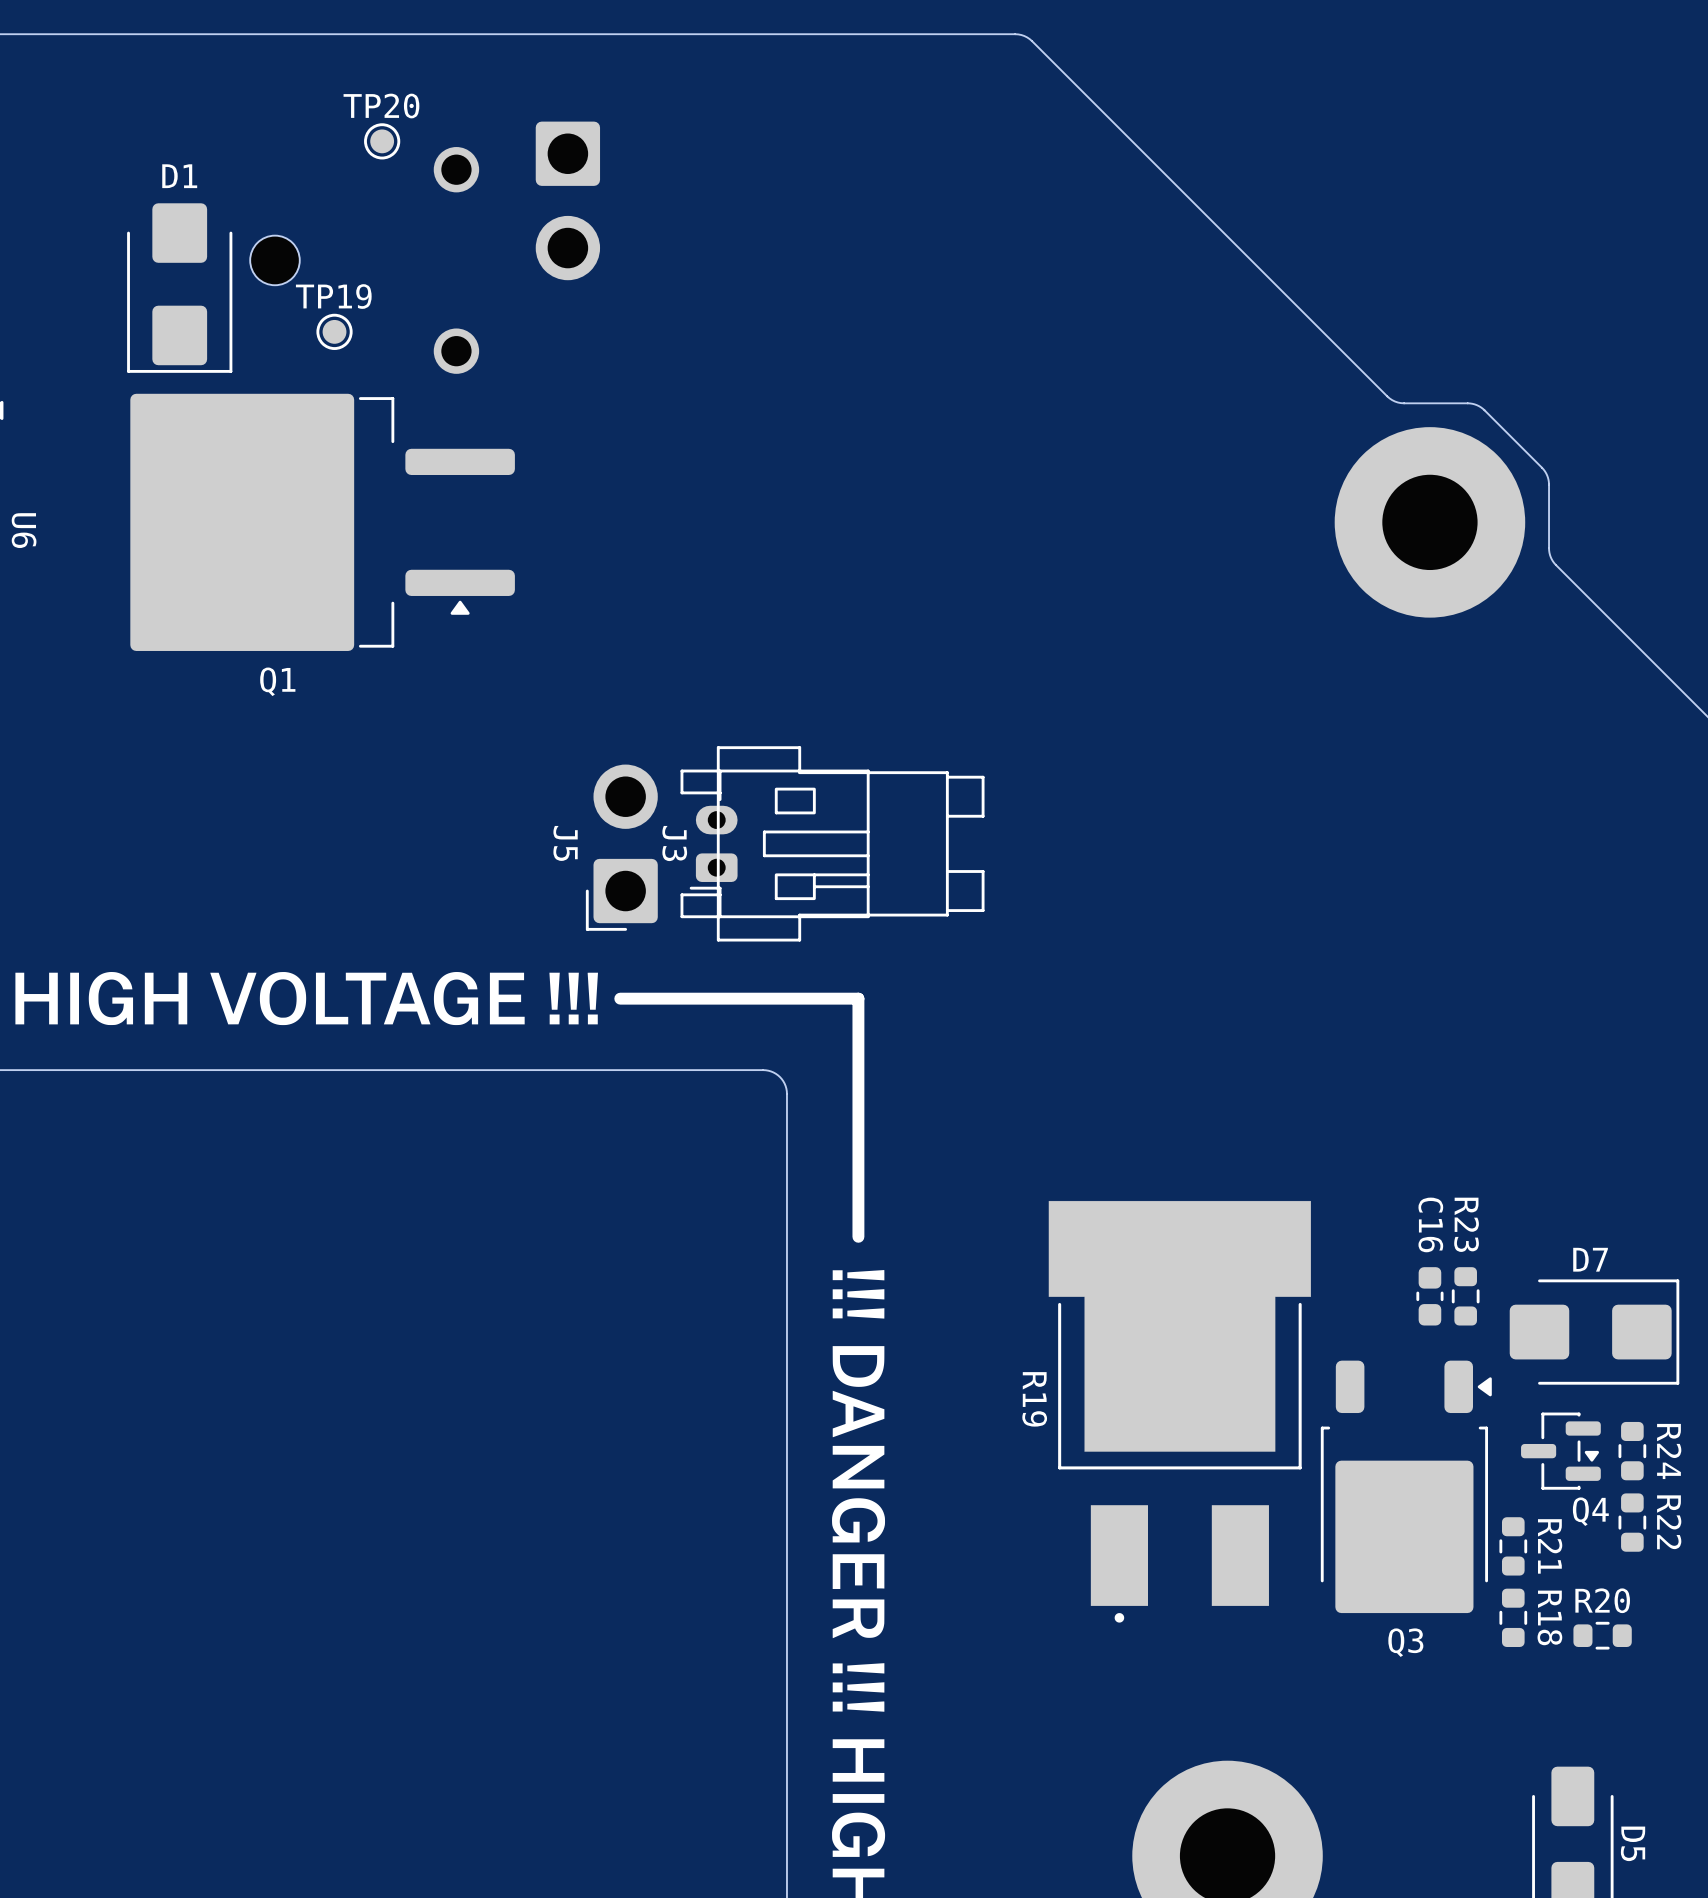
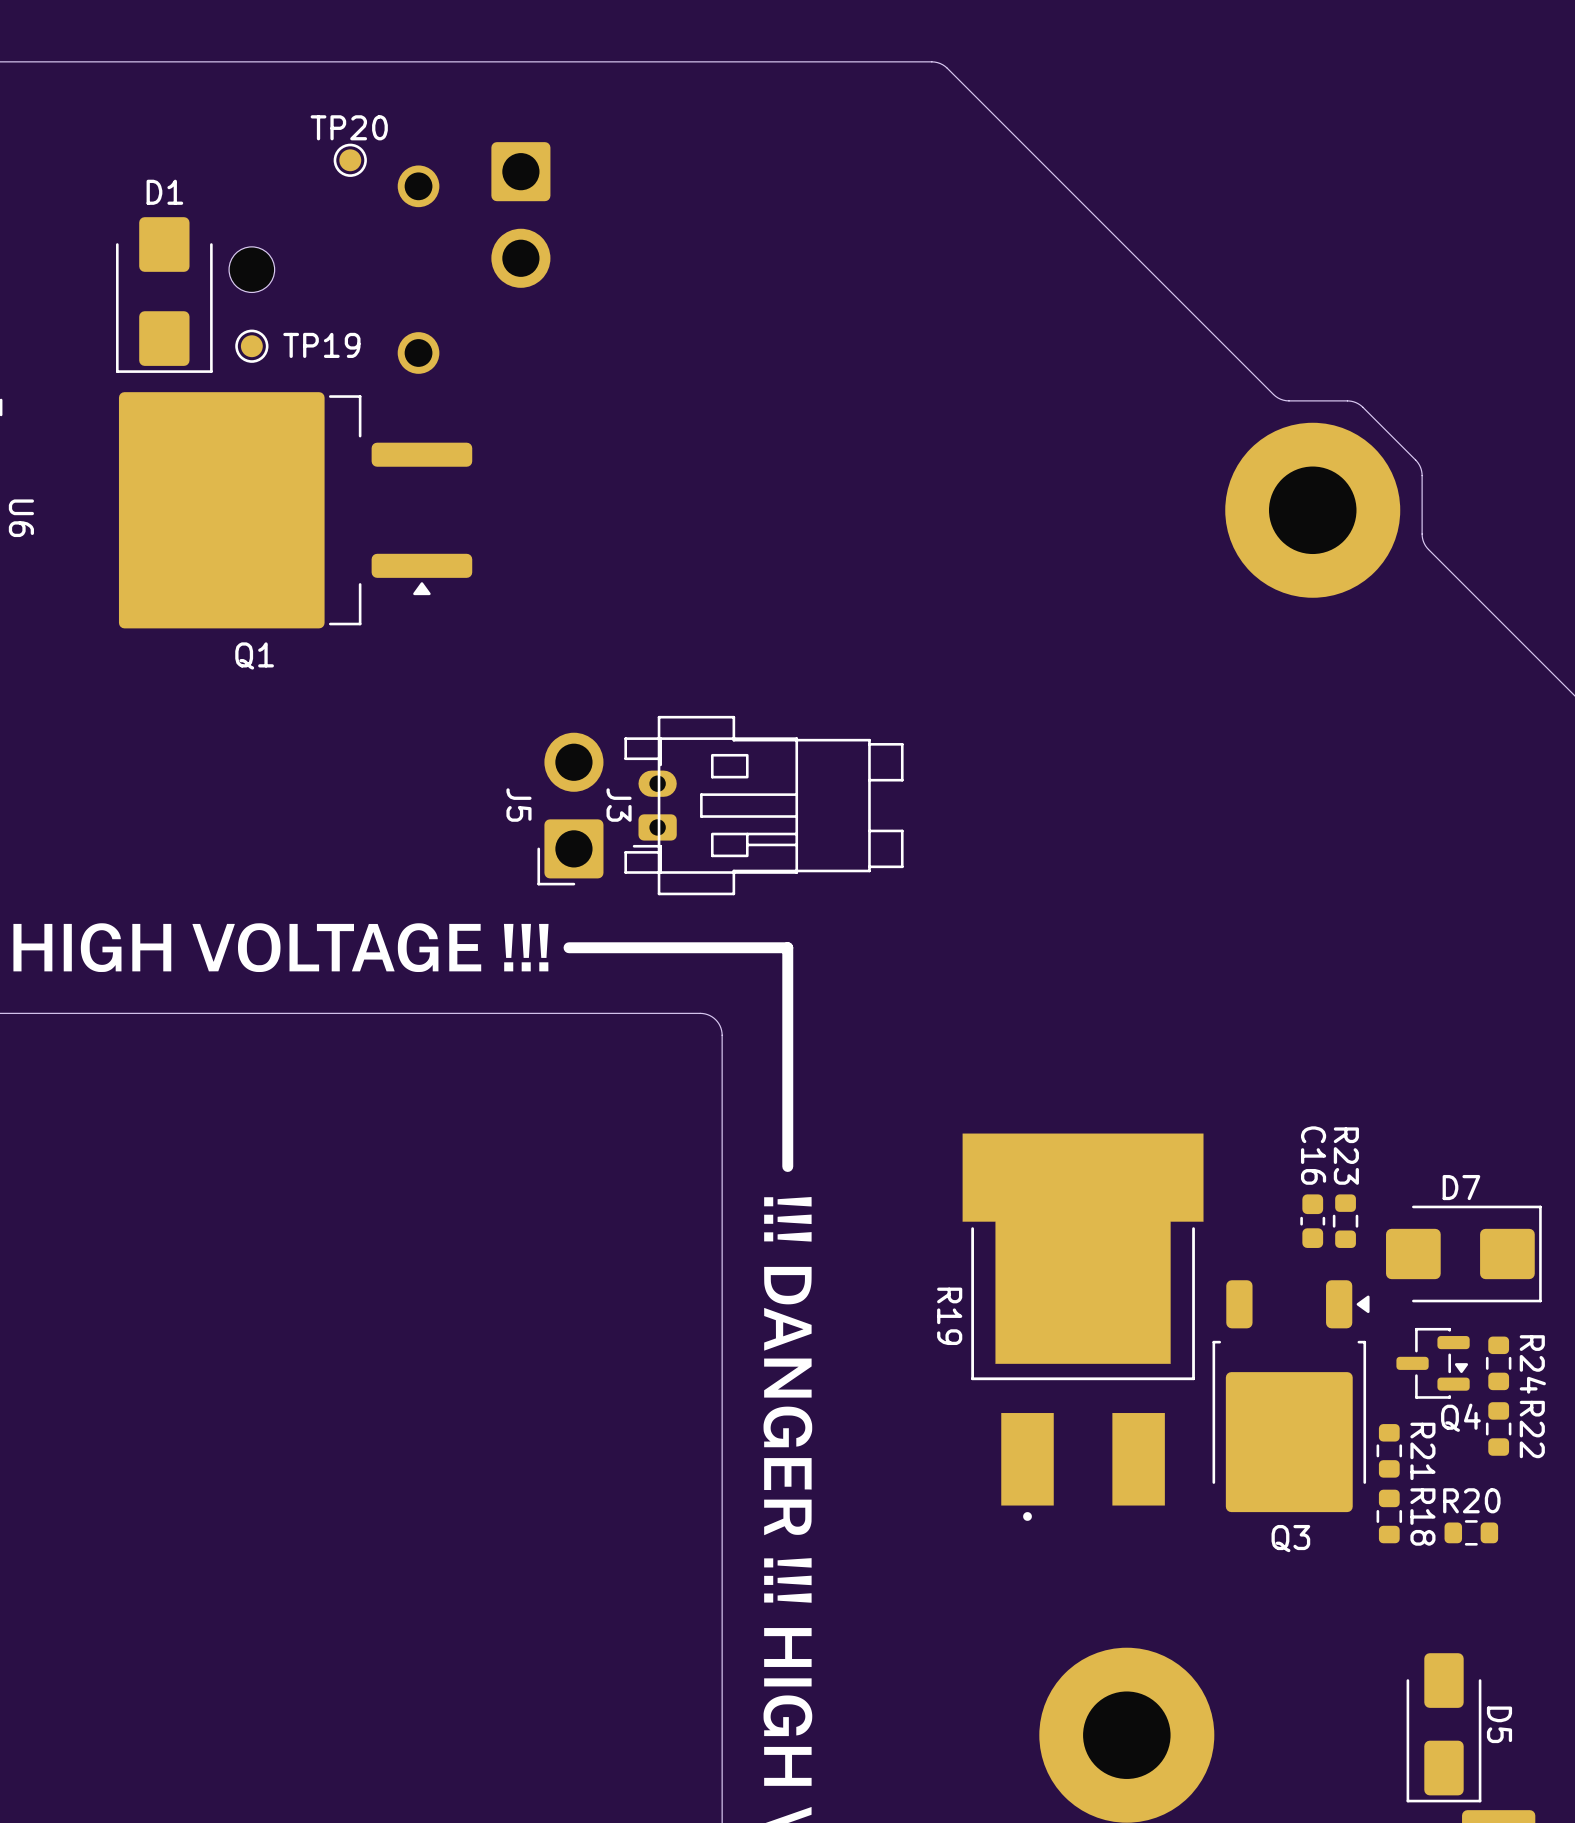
TP19 name position: TP19 (333, 296) -> TP19 (321, 345)
TP19 position: (334, 331) -> (251, 346)

